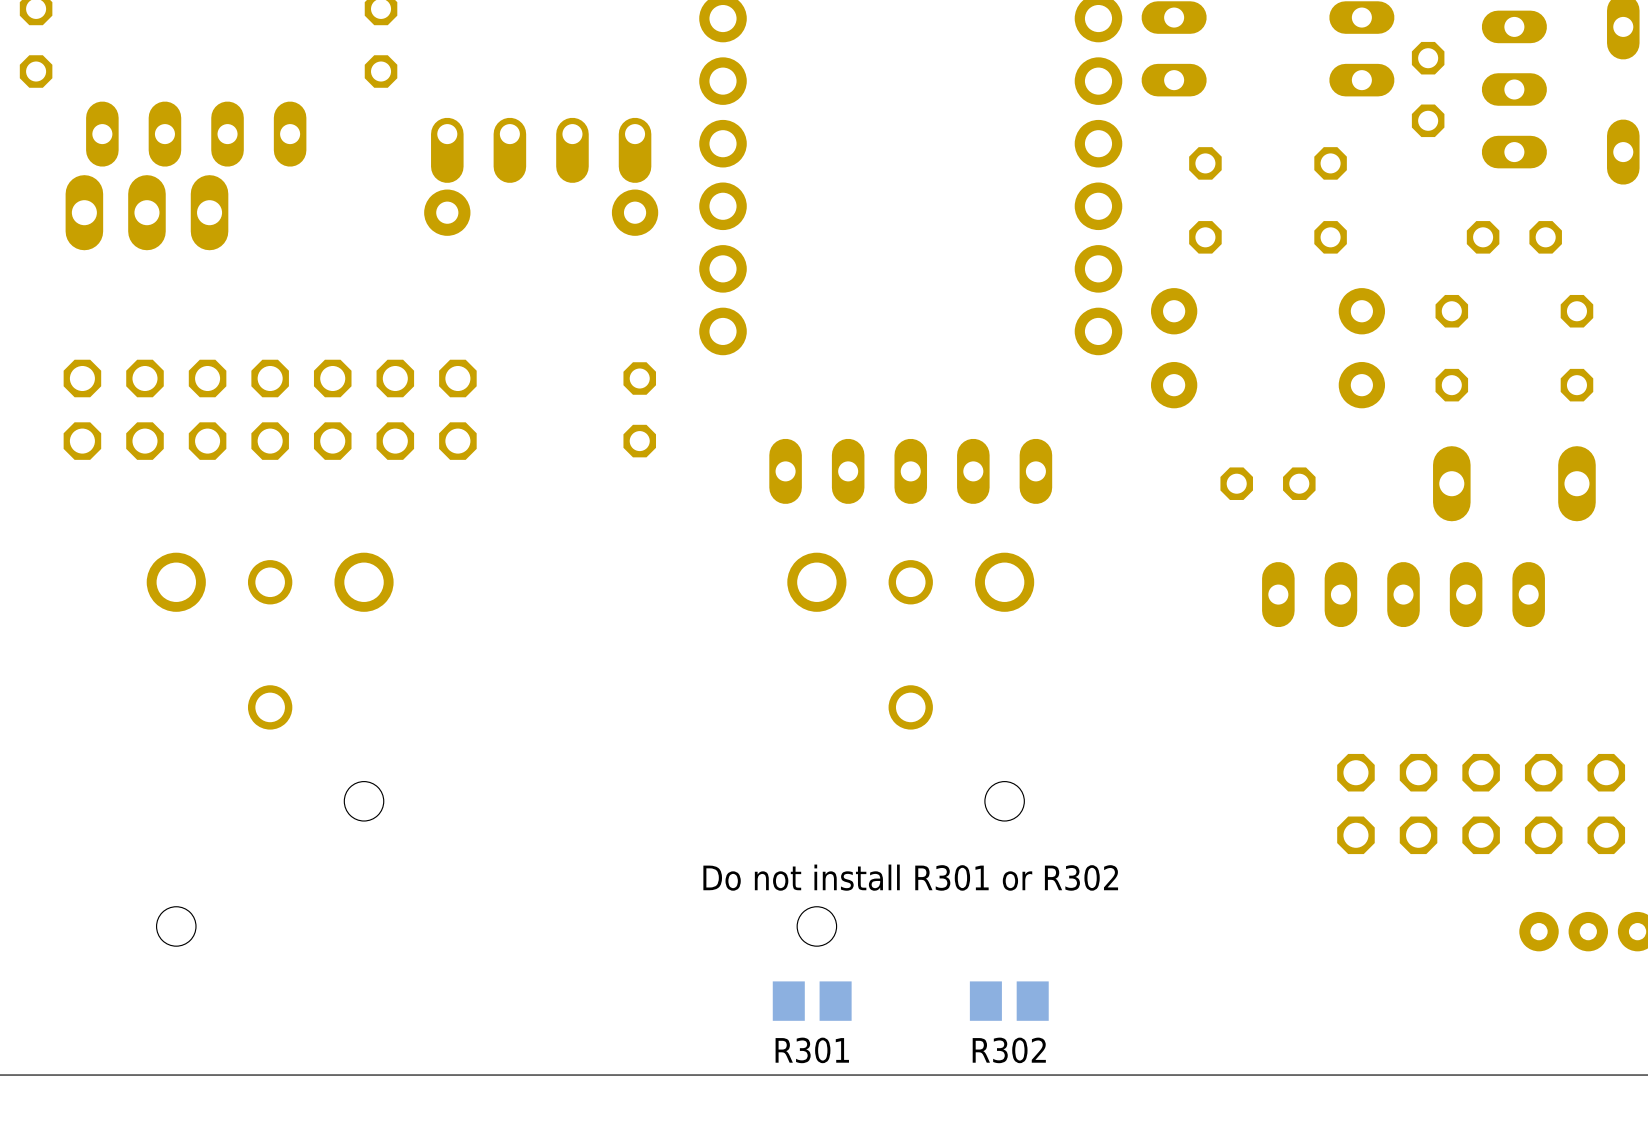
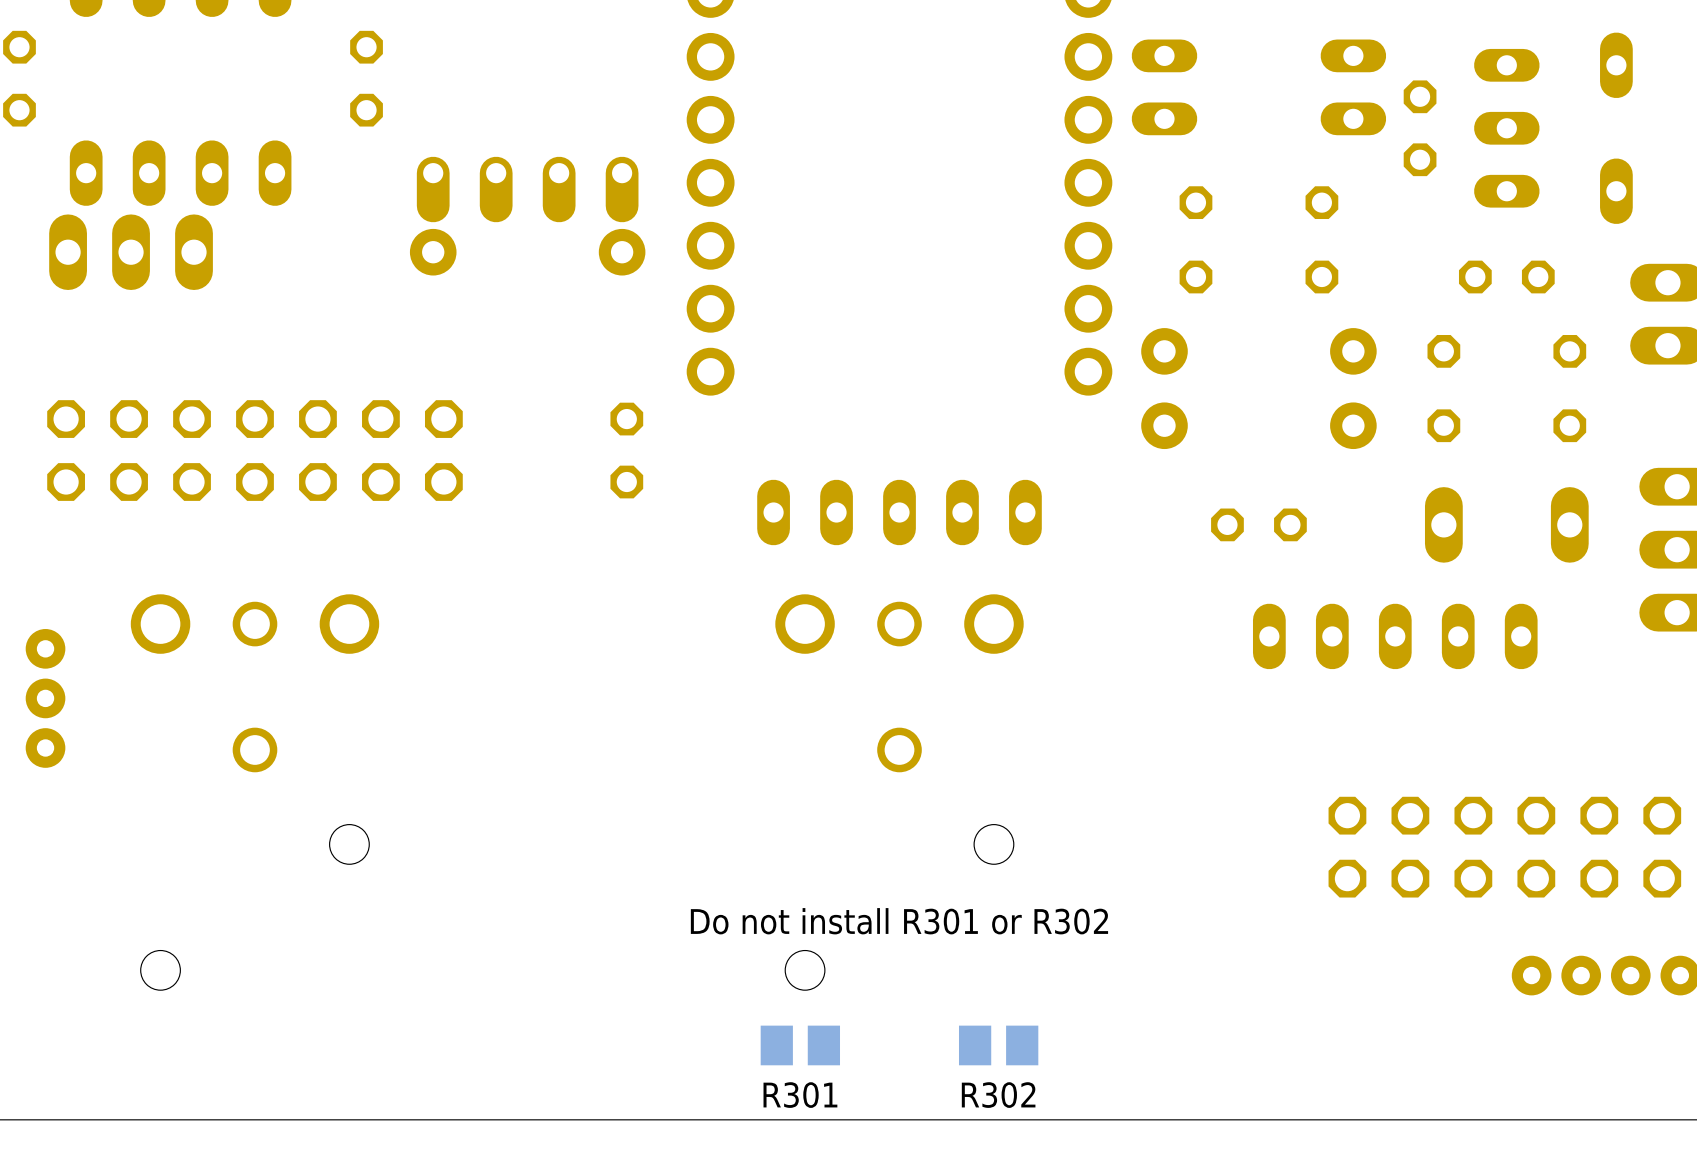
part: none -> (45, 698)

